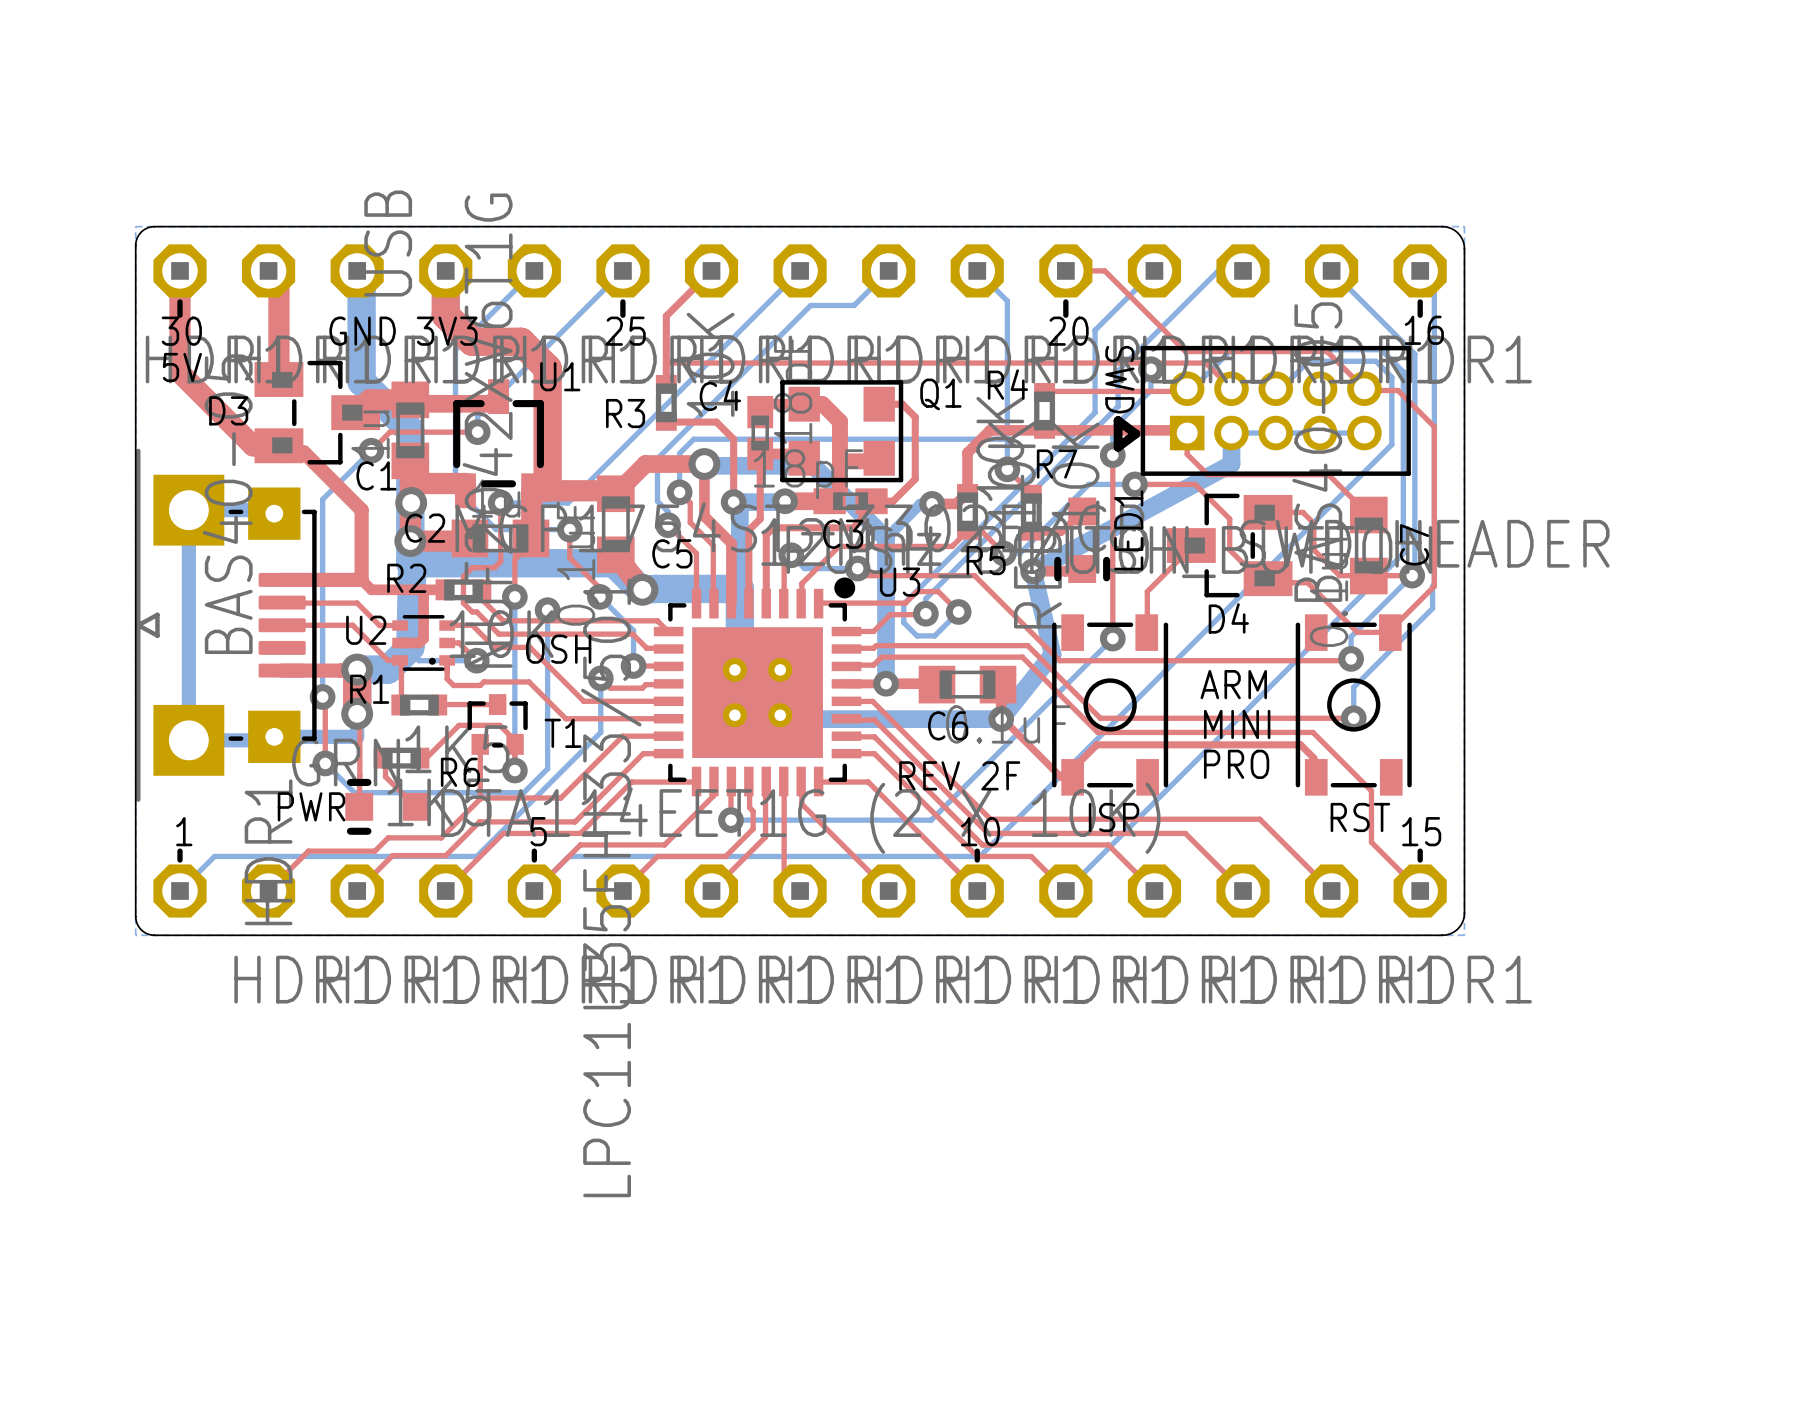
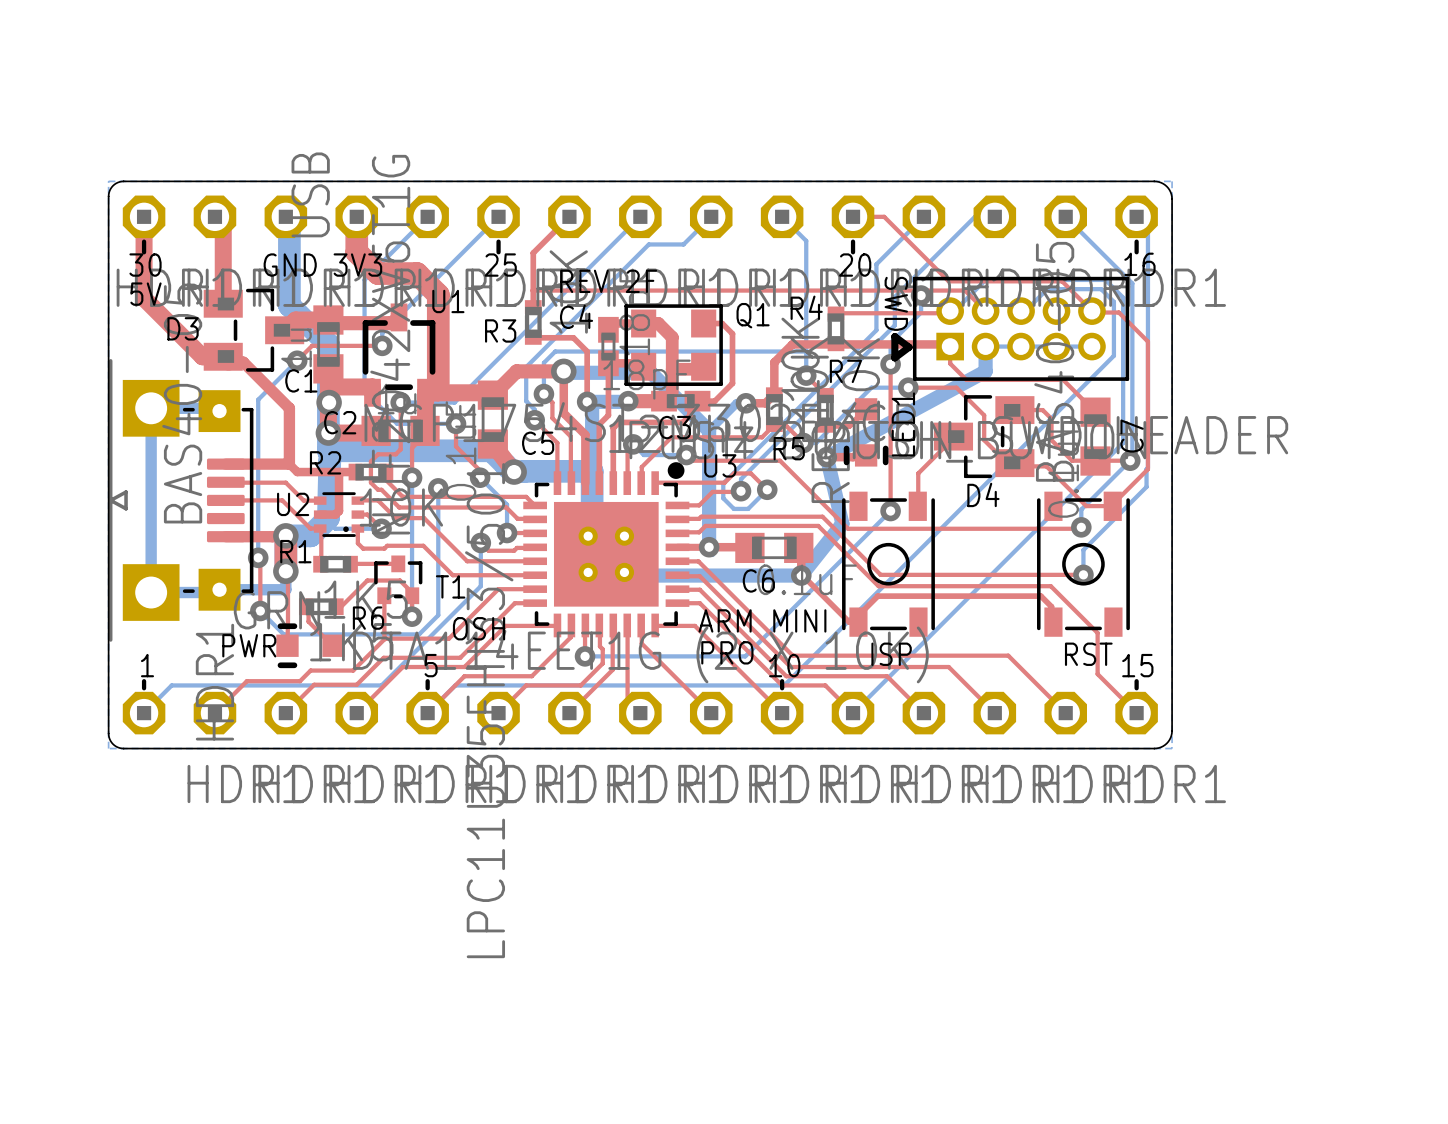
text position: OSH (558, 649) -> OSH (479, 628)
text: ARM (1233, 684) -> none
text: MINI (1237, 724) -> none
text position: PRO (1236, 764) -> PRO (727, 652)
text: none -> ARM MINI (762, 620)
text position: REV 2F (959, 775) -> REV 2F (608, 281)

